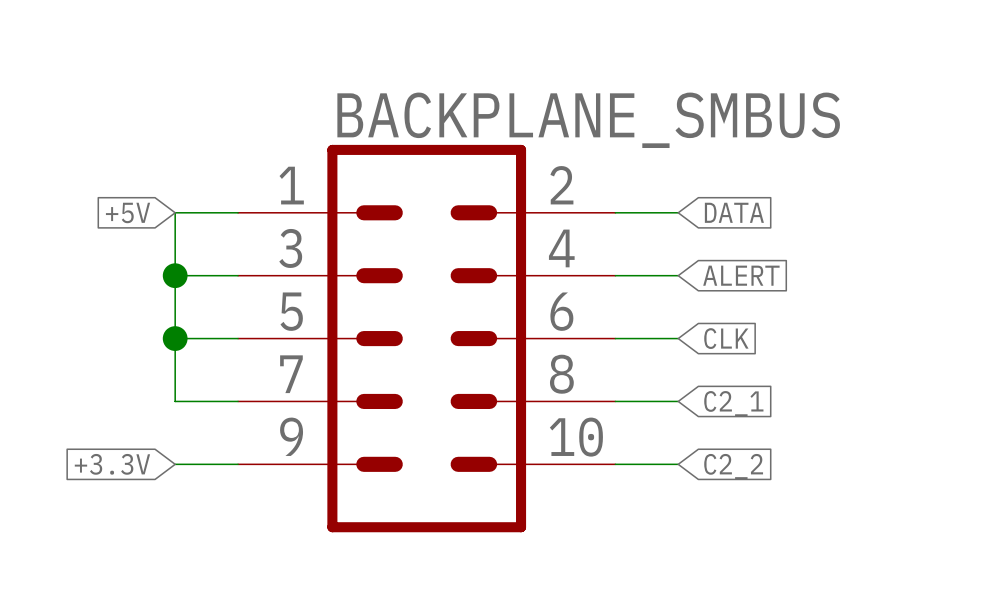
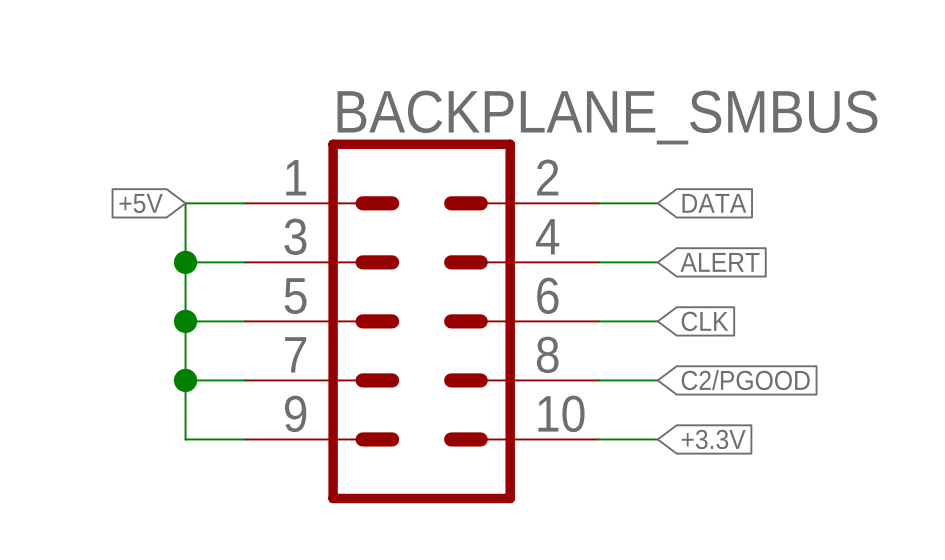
wire: none -> (185, 380) (185, 439)
junction: none -> (185, 380)
global label: C2_1 (733, 403) -> C2/PGOOD (745, 380)
global label: +3.3V (112, 464) -> none
global label: C2_2 (733, 466) -> +3.3V (713, 439)

